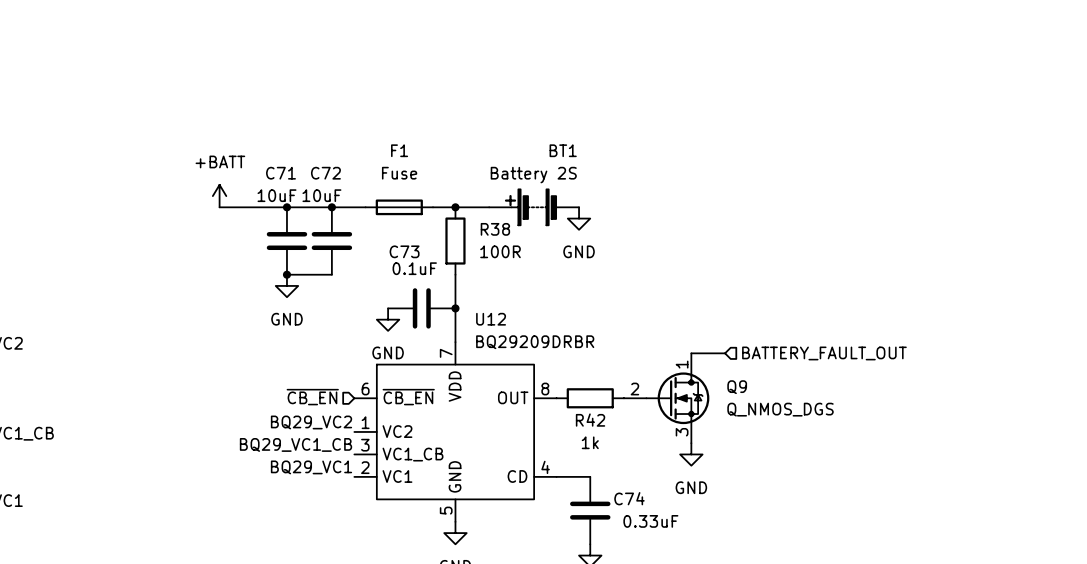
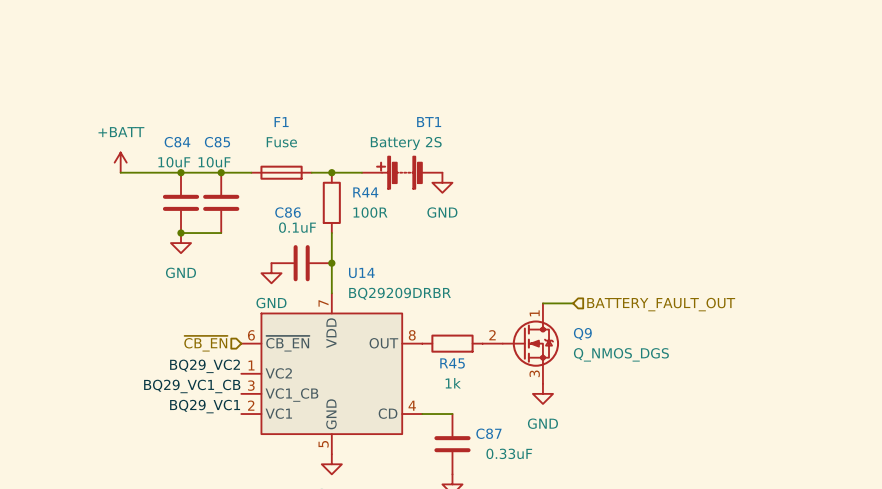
C71 name: C71 (281, 173) -> C84 (177, 142)
C72 name: C72 (325, 173) -> C85 (217, 142)
R38 name: R38 (495, 229) -> R44 (365, 192)
C73 name: C73 (404, 251) -> C86 (288, 212)
U12 name: U12 (491, 319) -> U14 (361, 272)
R42 name: R42 (590, 420) -> R45 (452, 363)
C74 name: C74 (629, 498) -> C87 (488, 433)

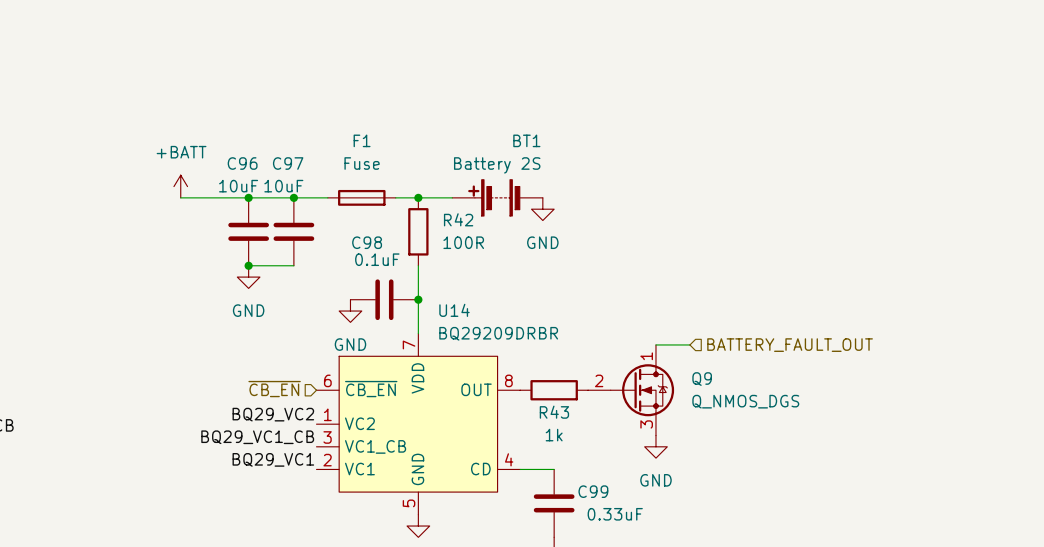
C84 name: C84 (177, 142) -> C96 (242, 163)
C85 name: C85 (217, 142) -> C97 (288, 163)
R44 name: R44 (365, 192) -> R42 (458, 219)
C86 name: C86 (288, 212) -> C98 (367, 242)
R45 name: R45 (452, 363) -> R43 (554, 412)
C87 name: C87 (488, 433) -> C99 (593, 491)

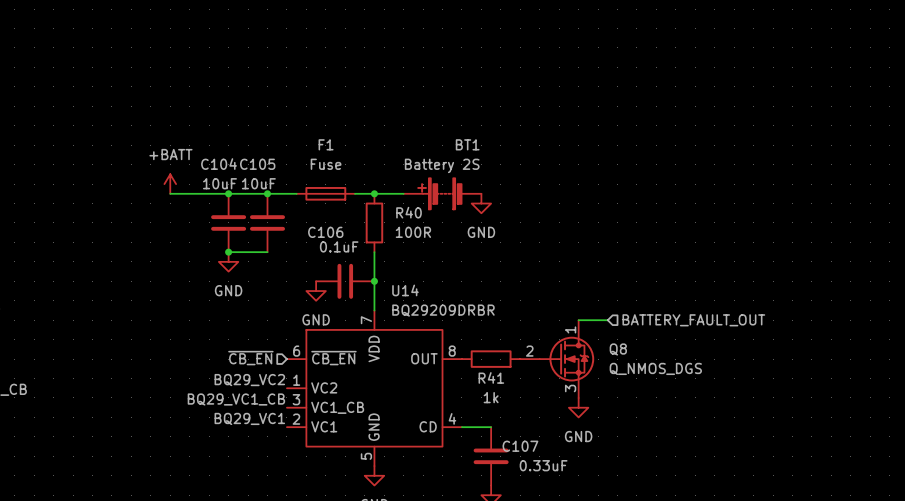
C96 name: C96 (242, 163) -> C104 (219, 164)
C97 name: C97 (288, 163) -> C105 (257, 164)
R42 name: R42 (458, 219) -> R40 (409, 212)
C98 name: C98 (367, 242) -> C106 (325, 232)
Q9 name: Q9 (702, 379) -> Q8 (618, 349)
R43 name: R43 (554, 412) -> R41 (491, 377)
C99 name: C99 (593, 491) -> C107 (520, 446)

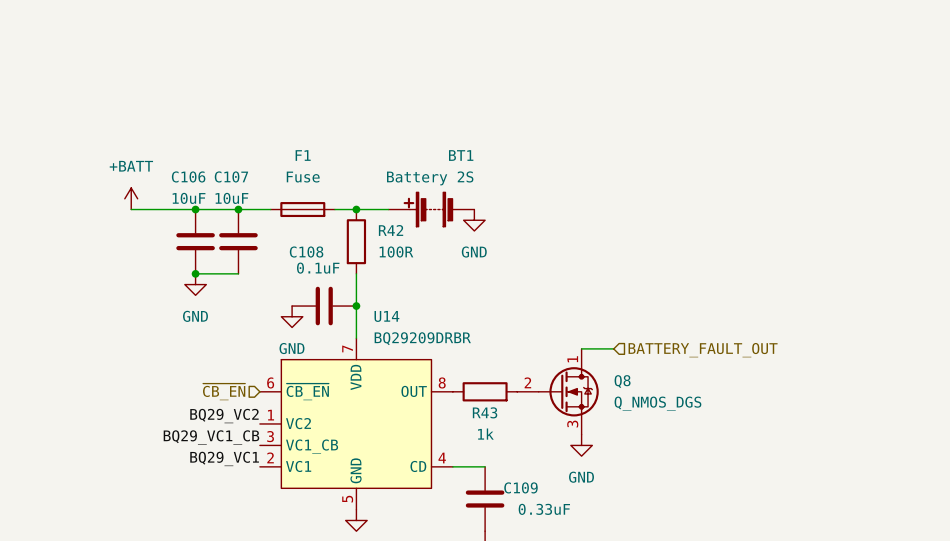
C104 name: C104 (219, 164) -> C106 (188, 176)
C105 name: C105 (257, 164) -> C107 (231, 176)
R40 name: R40 (409, 212) -> R42 (391, 230)
C106 name: C106 (325, 232) -> C108 (306, 252)
R41 name: R41 (491, 377) -> R43 (485, 412)
C107 name: C107 (520, 446) -> C109 (520, 487)

